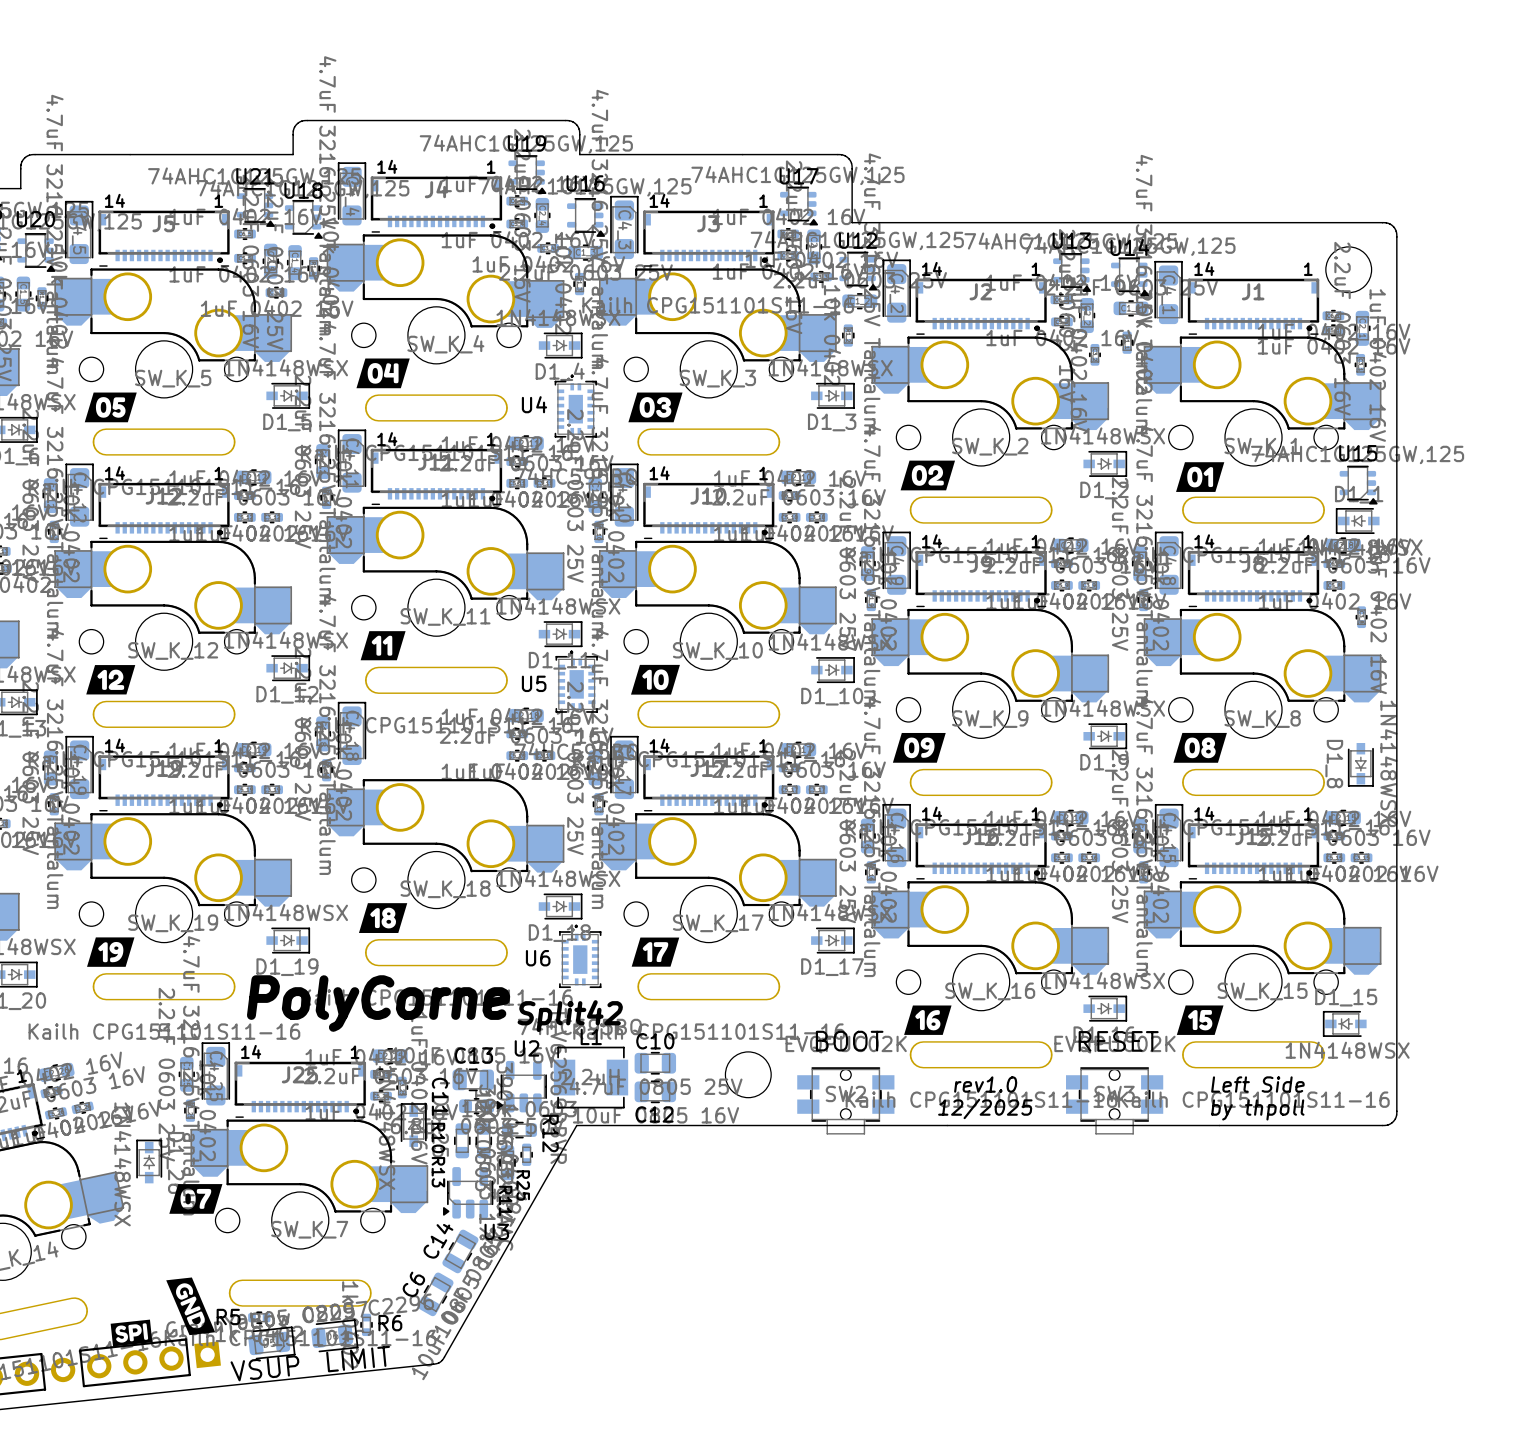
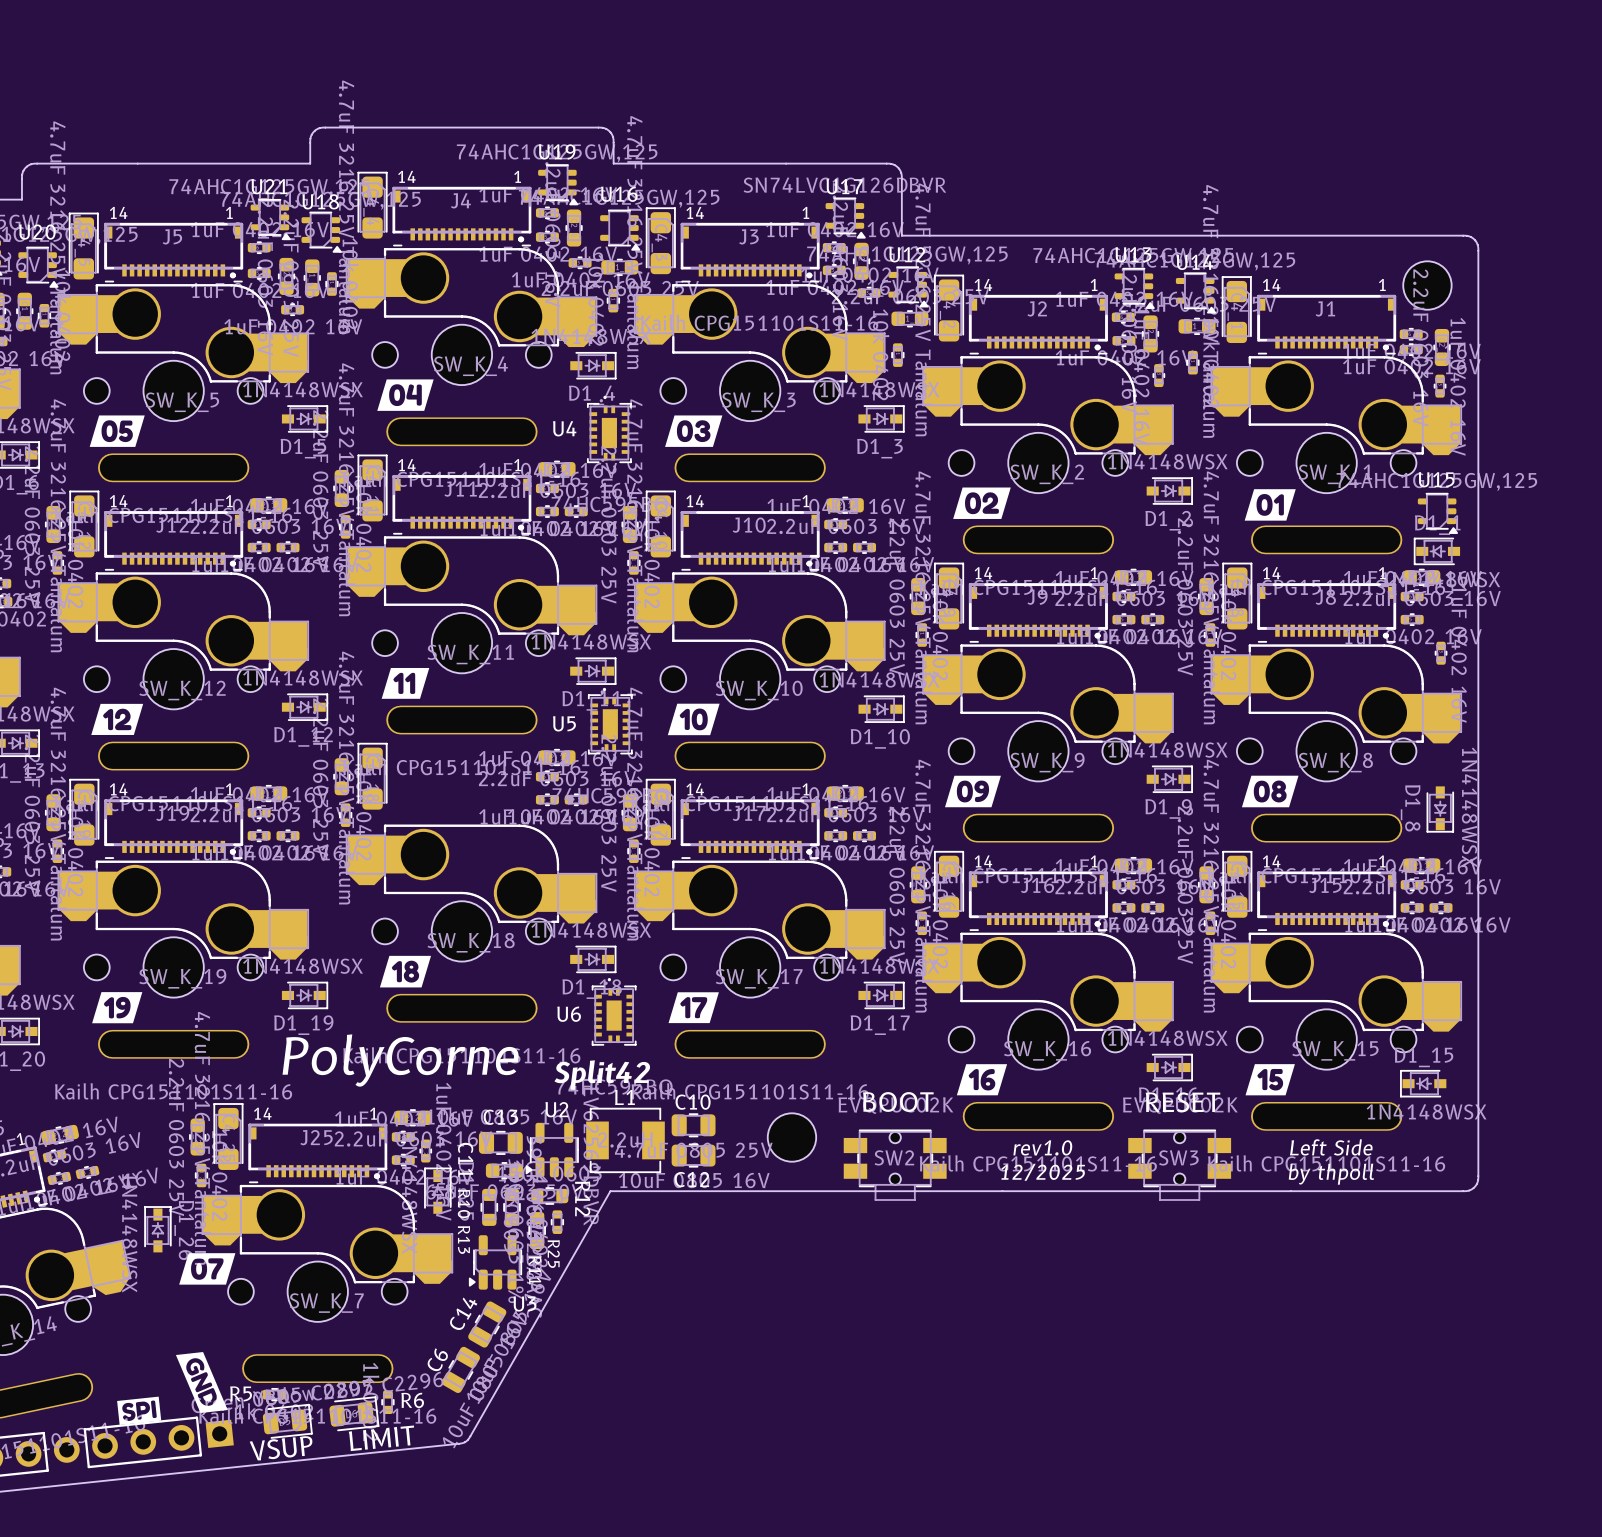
U17 value: 74AHC1G125GW,125 (797, 175) -> SN74LVC1G126DBVR (844, 185)

